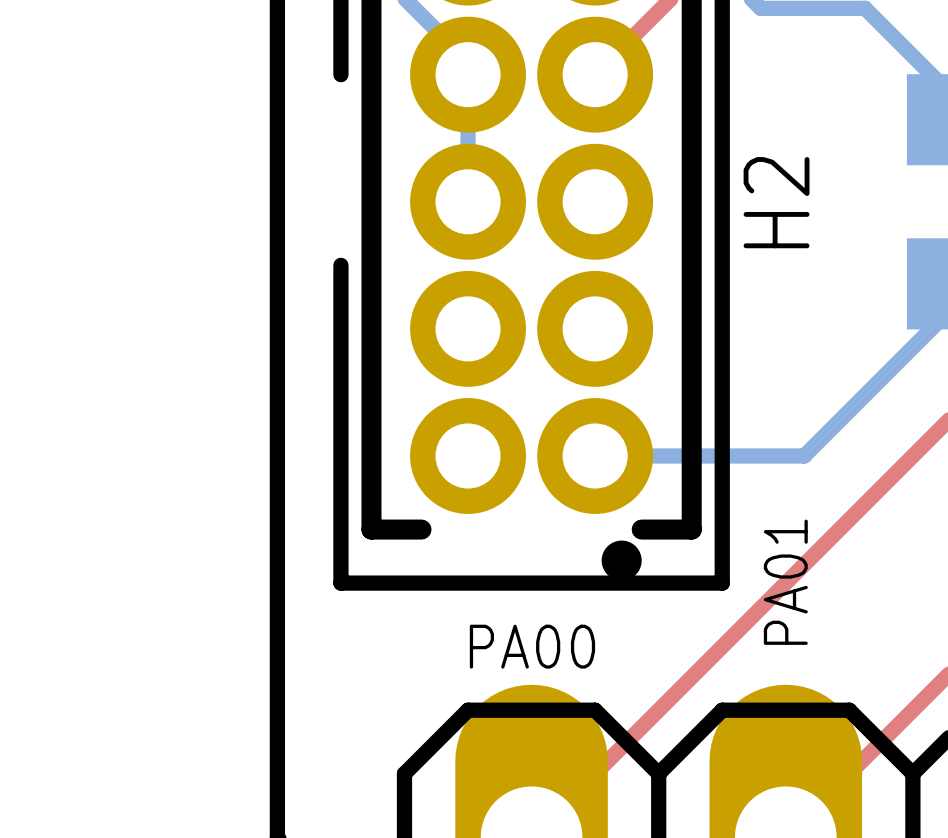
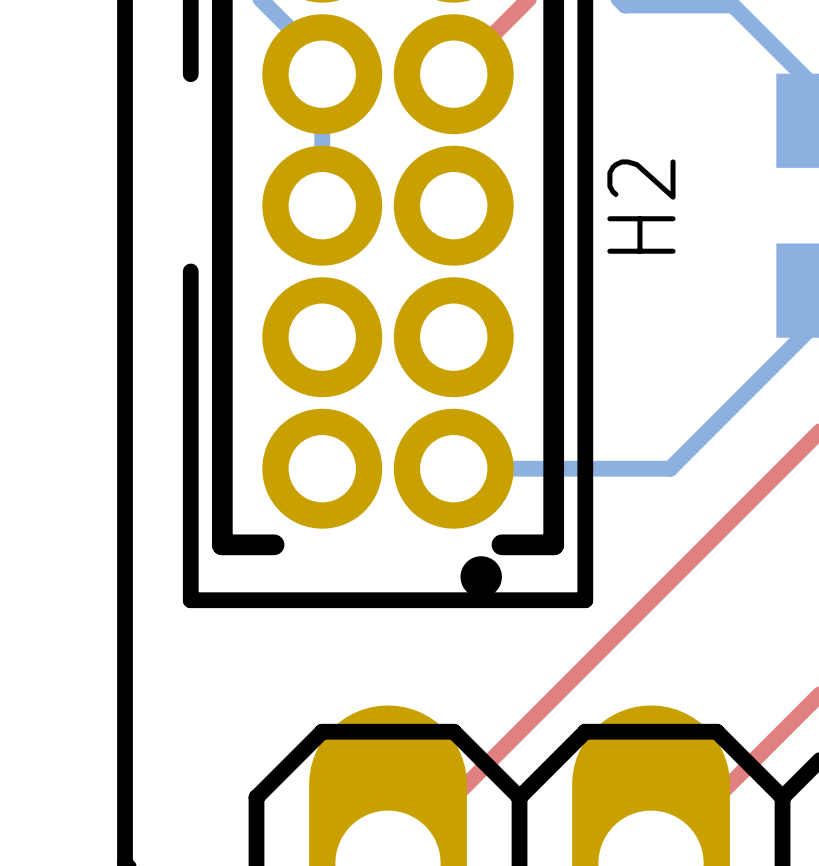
text: PA01 (785, 582) -> none
text: PA00 (532, 646) -> none

